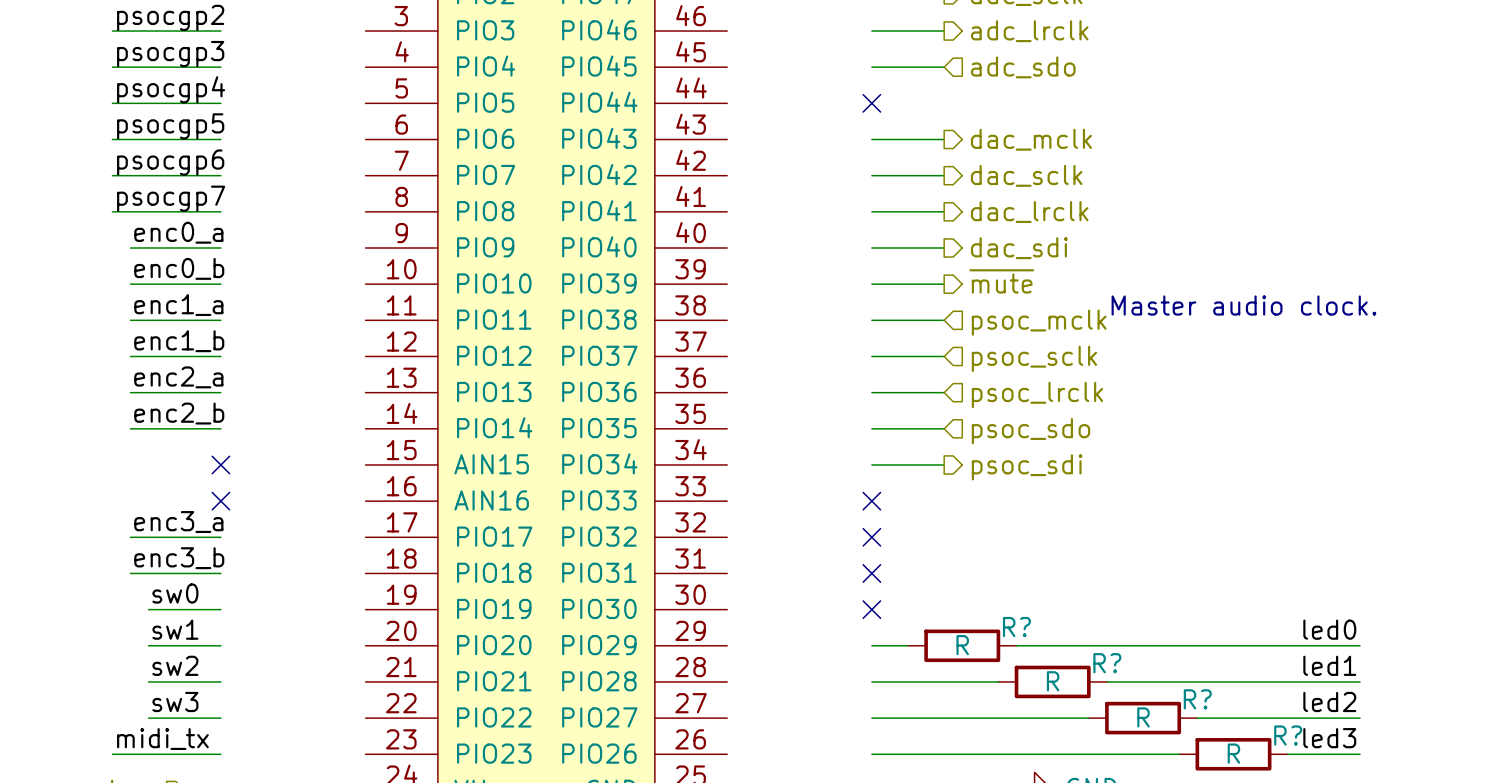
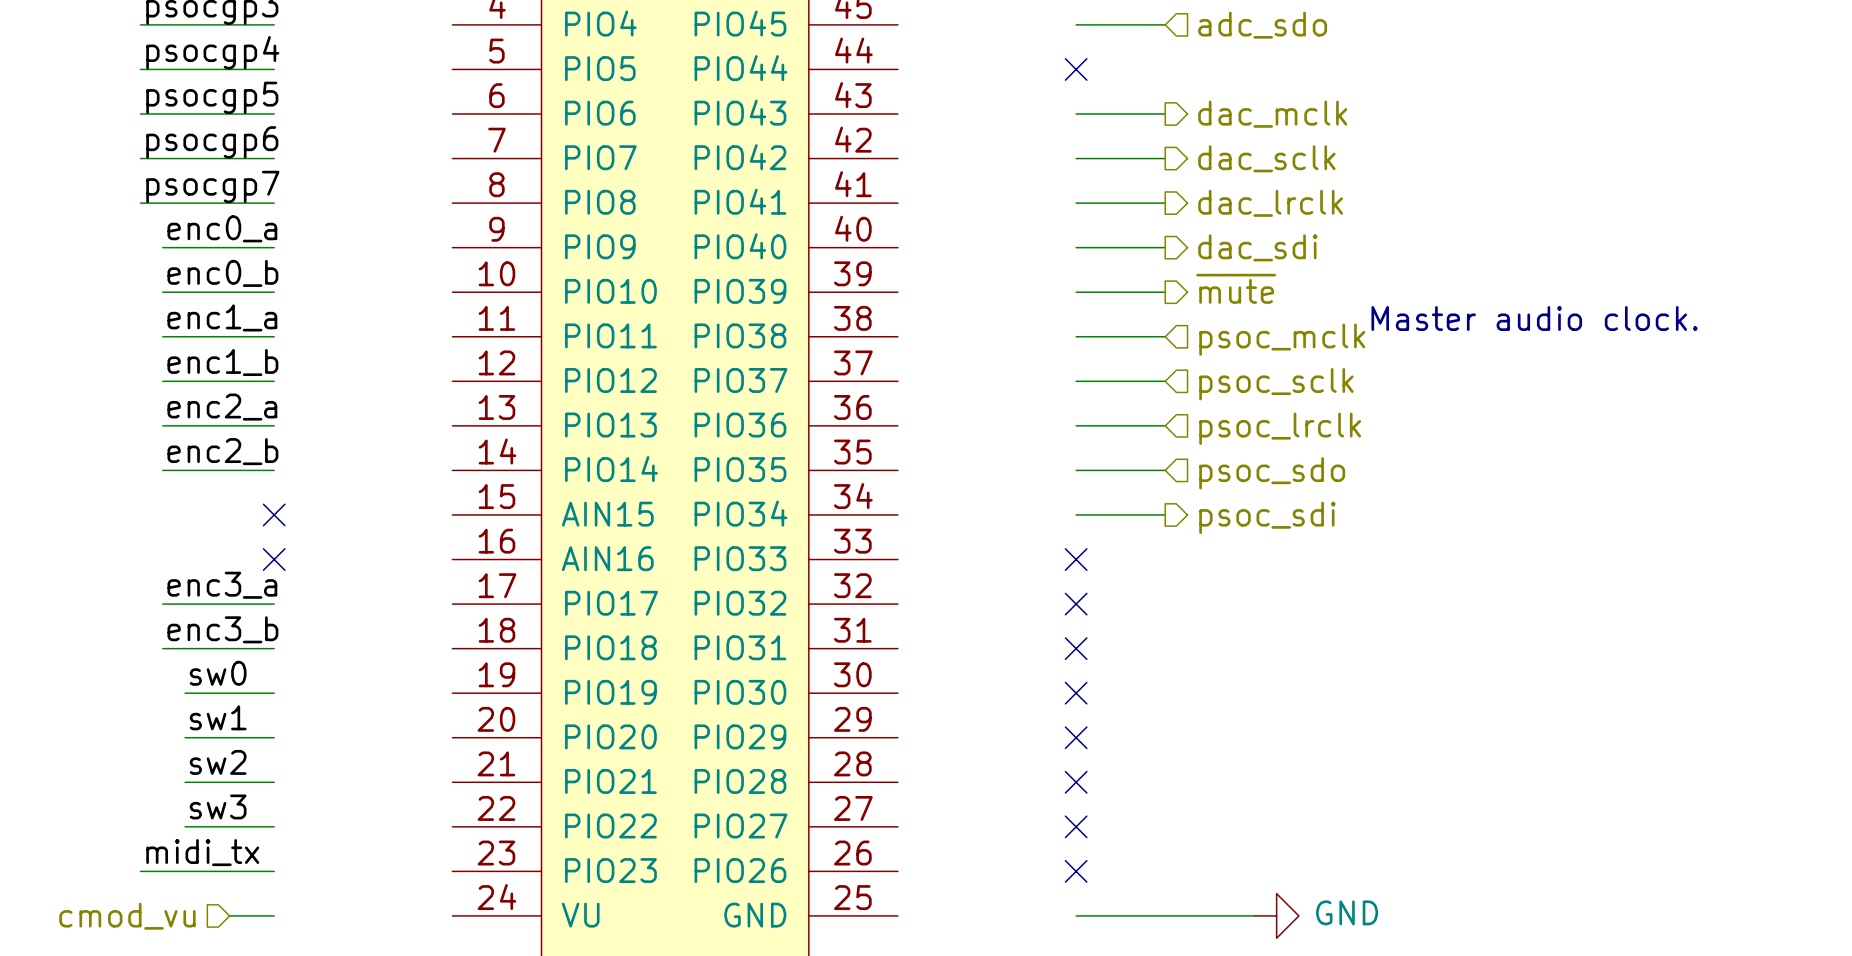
label: led0 (1329, 629) -> none
wire: (871, 645) (908, 645) -> none
no-connect mark: none -> (1076, 737)
R?: R (962, 645) -> none
wire: (1016, 645) (1360, 645) -> none
label: led1 (1329, 665) -> none
wire: (871, 681) (998, 681) -> none
no-connect mark: none -> (1076, 782)
R?: R (1052, 681) -> none
wire: (1106, 681) (1360, 681) -> none
label: led2 (1329, 701) -> none
wire: (871, 718) (1088, 718) -> none
no-connect mark: none -> (1076, 826)
R?: R (1143, 718) -> none
wire: (1197, 718) (1360, 718) -> none
label: led3 (1329, 738) -> none
wire: (871, 754) (1179, 754) -> none
no-connect mark: none -> (1076, 871)
R?: R (1233, 754) -> none
wire: (1287, 754) (1360, 754) -> none

